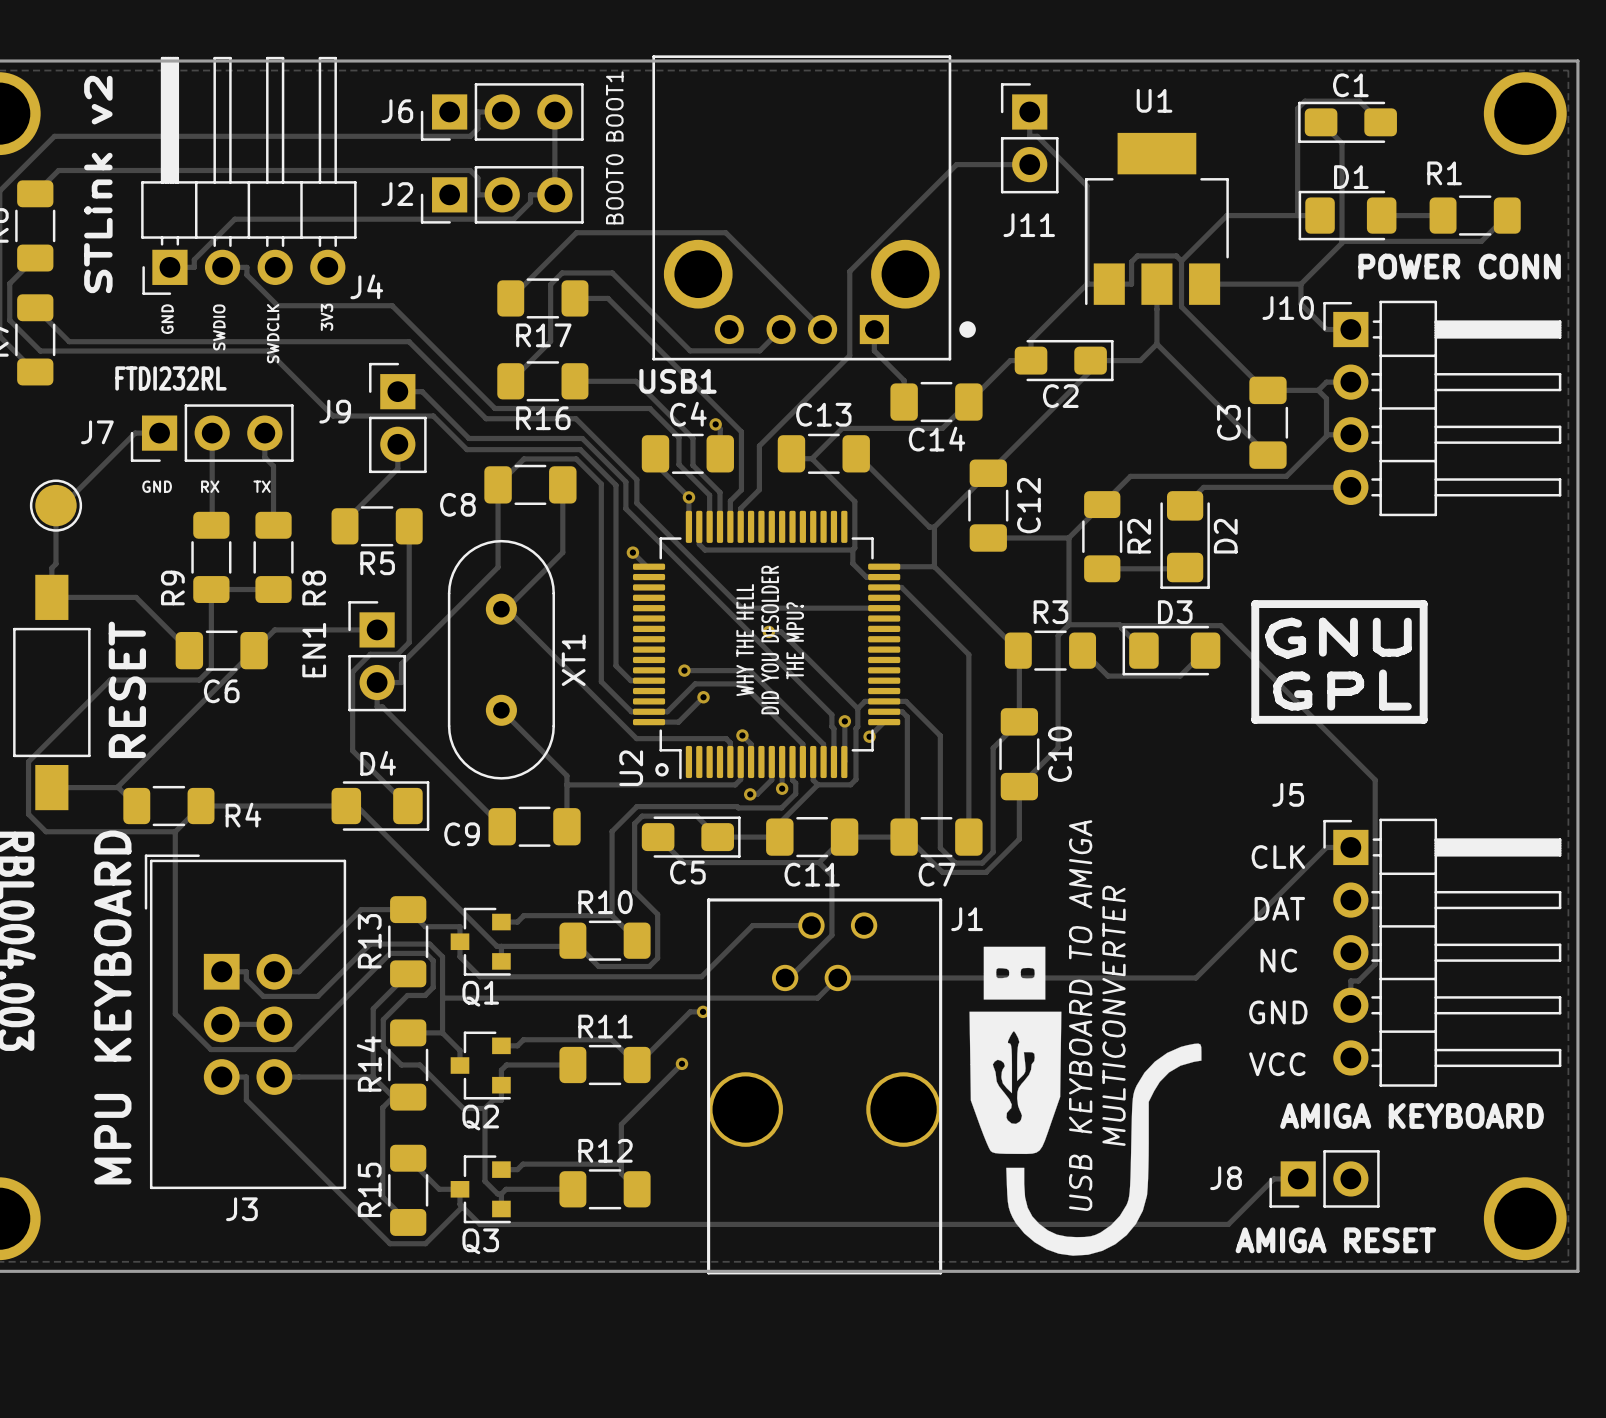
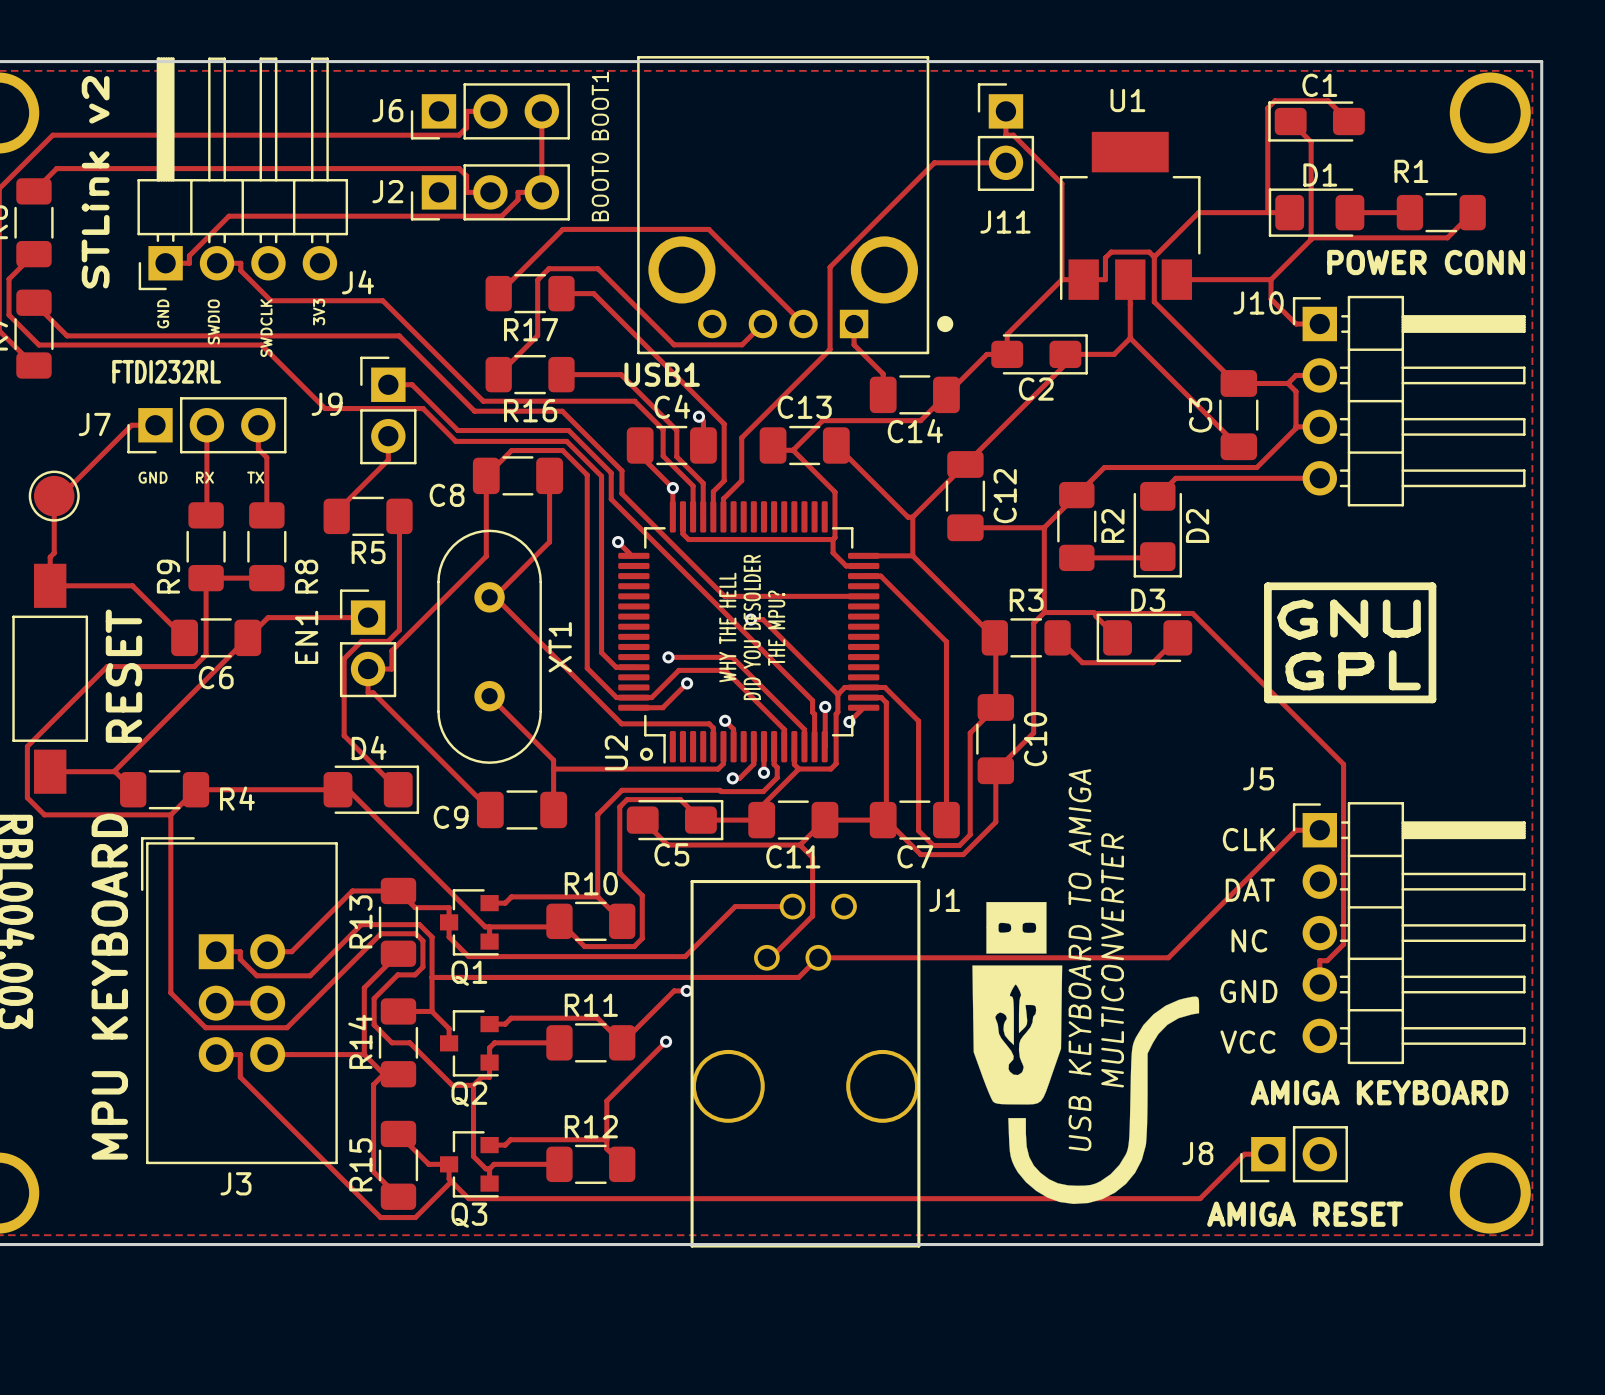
drawing position: (1339, 661) -> (1350, 642)
text position: USB KEYBOARD TO AMIGA (1080, 1015) -> USB KEYBOARD TO AMIGA (1080, 960)
text position: MULTICONVERTER (1114, 1015) -> MULTICONVERTER (1112, 960)
drawing position: (1085, 1101) -> (1085, 1052)

